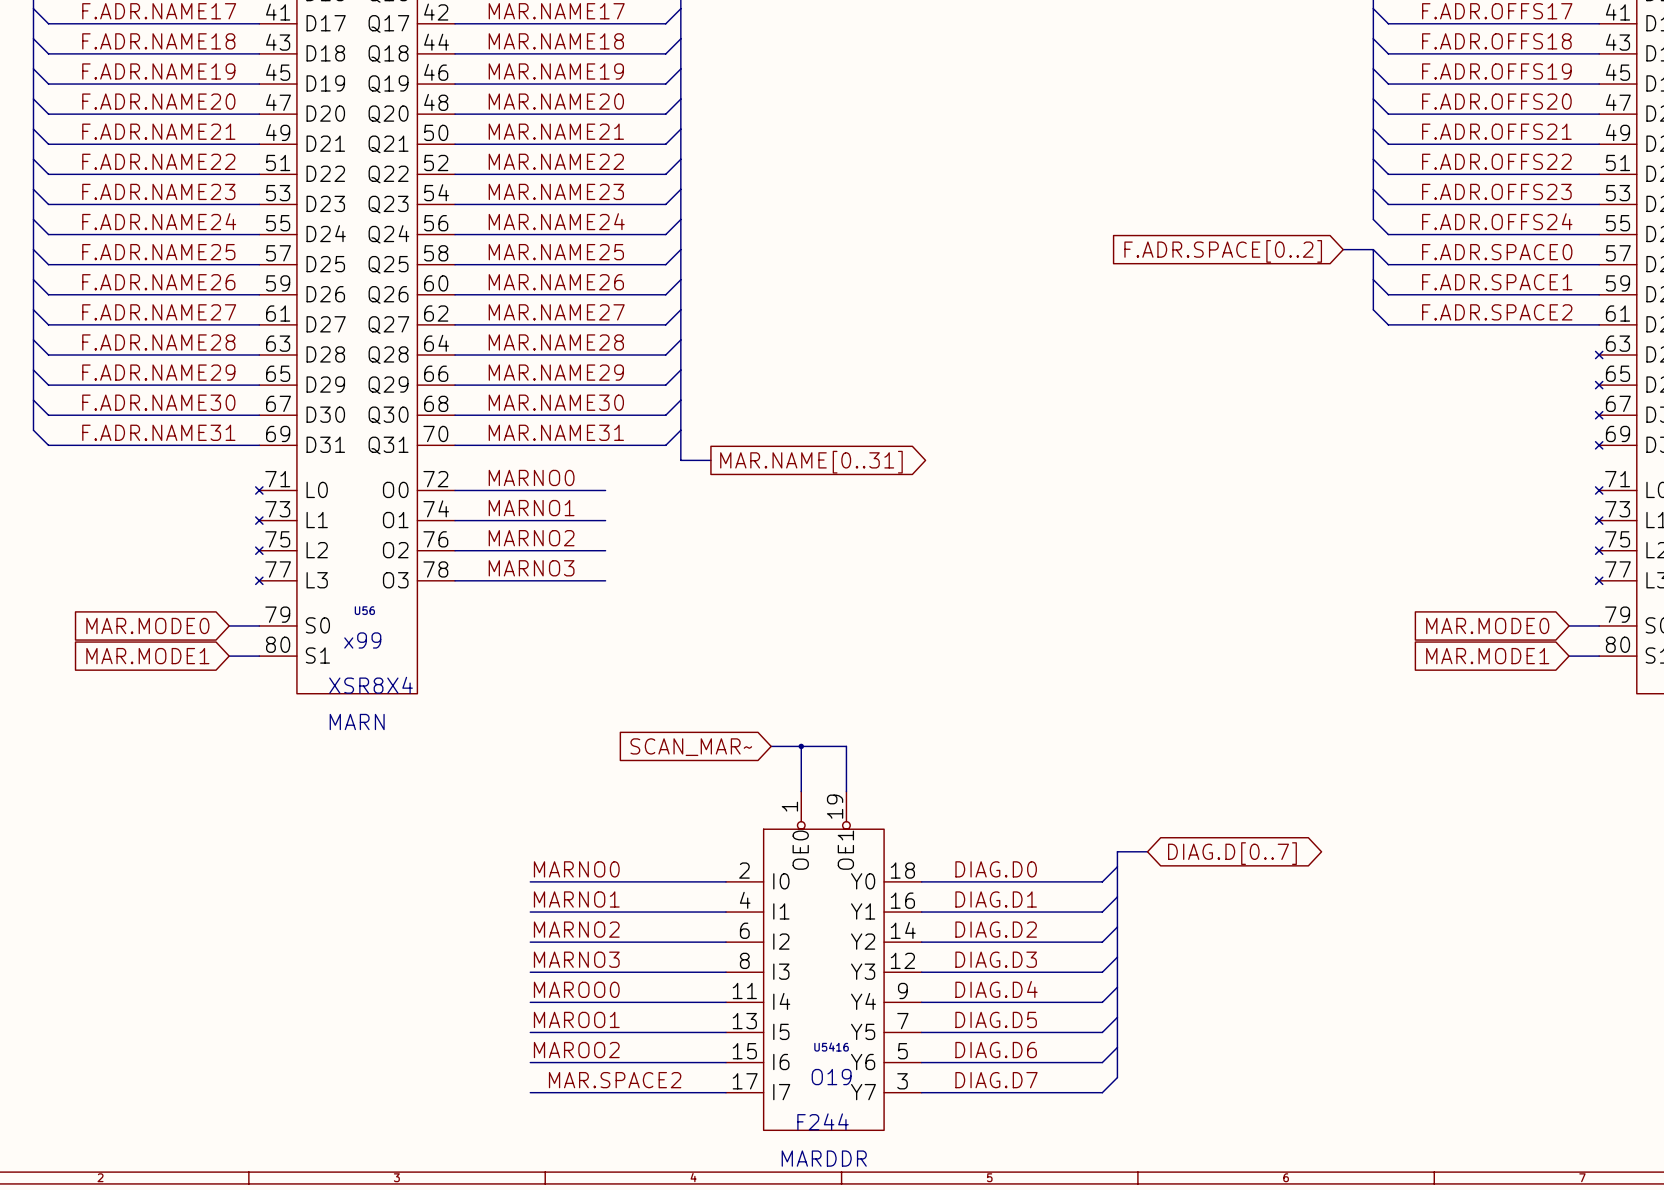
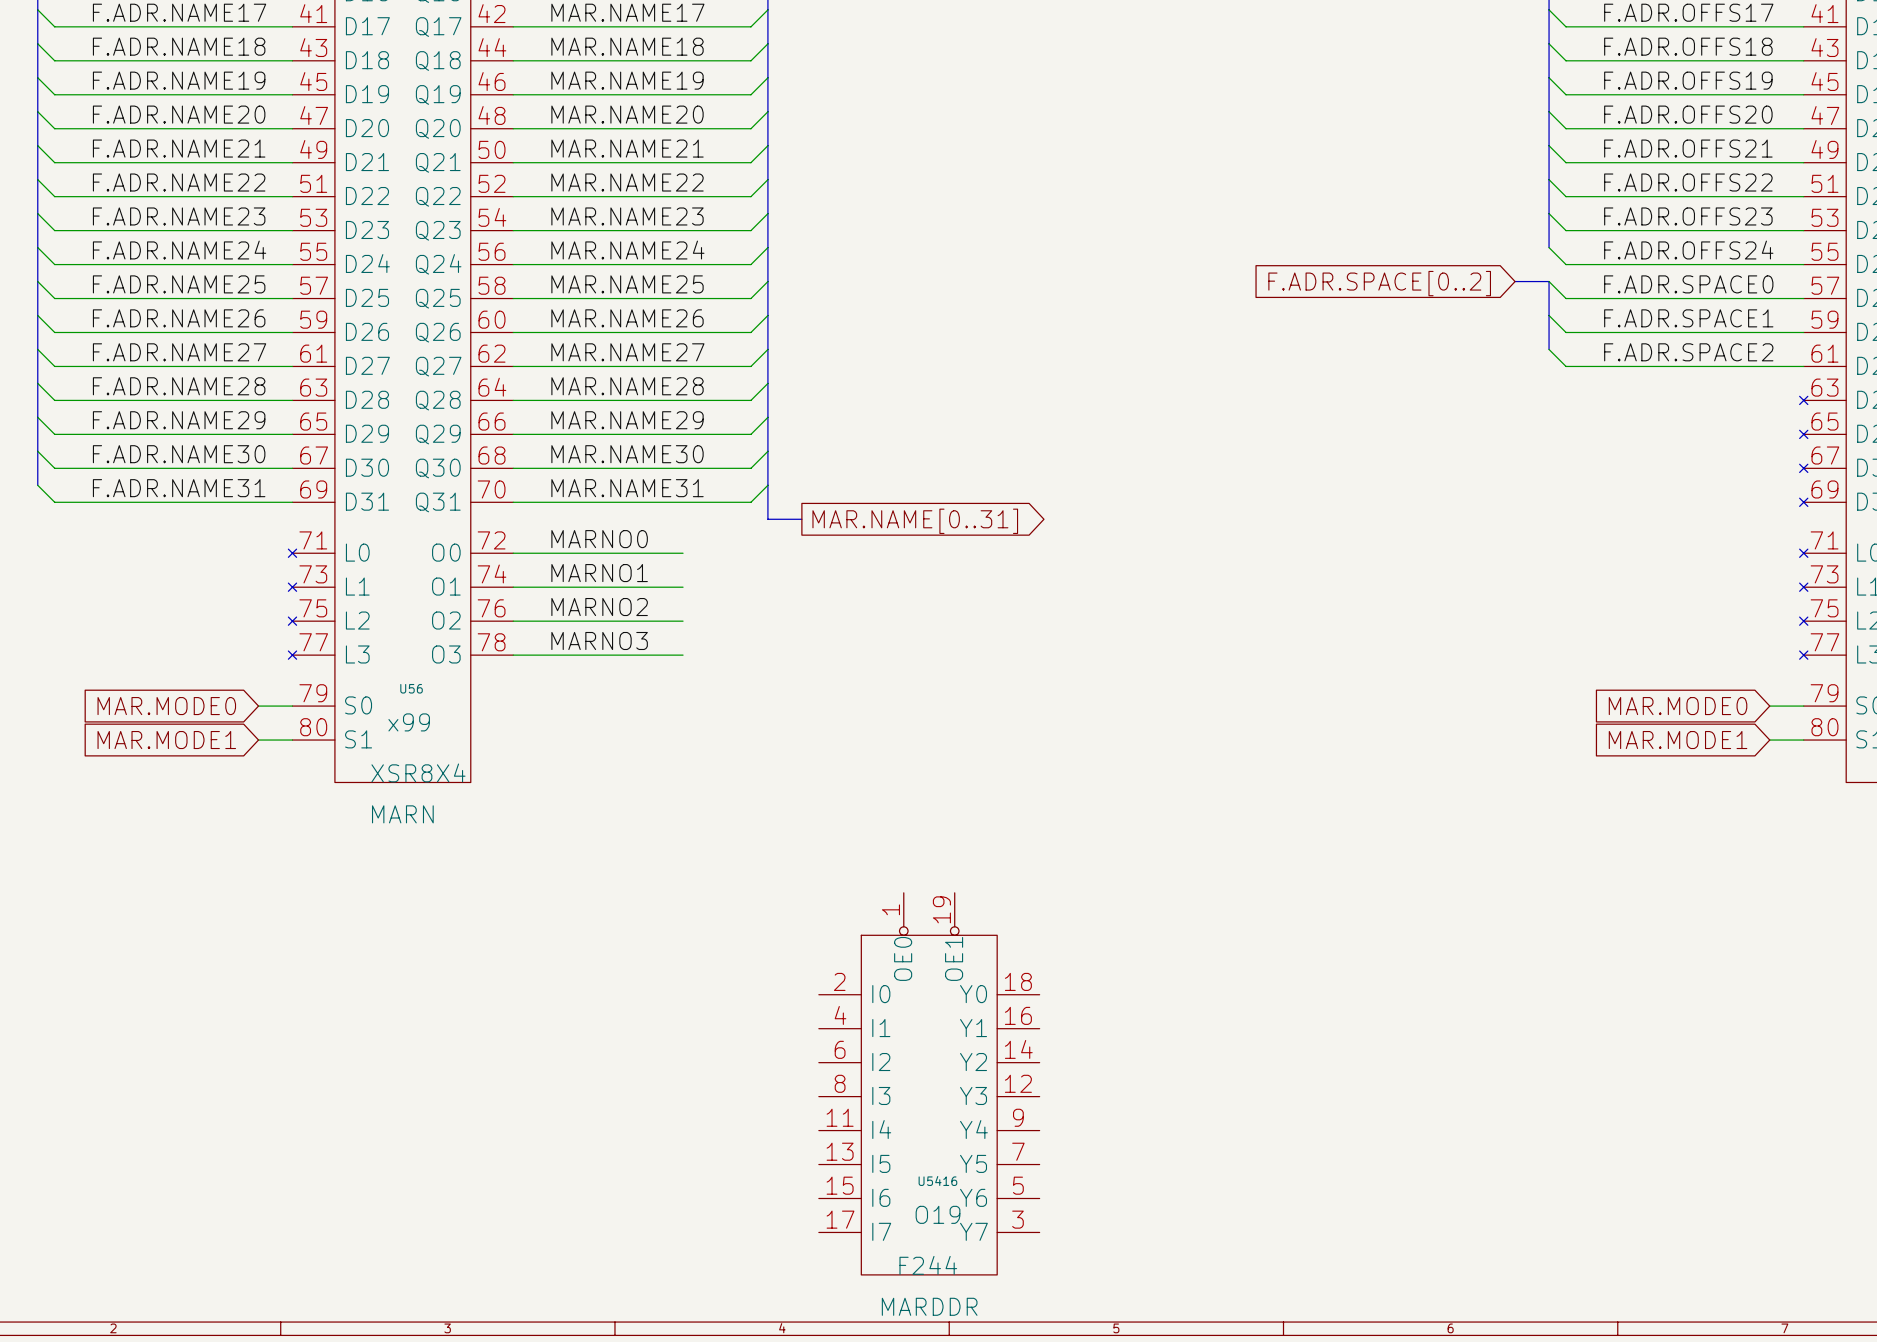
wire: (771, 746) (846, 746) (846, 791) -> none
wire: (801, 746) (801, 791) -> none
junction: (801, 746) -> none
global label: SCAN_MAR~ (691, 747) -> none
bus: (1147, 851) (1117, 851) (1117, 1077) -> none
global label: DIAG.D[0..7] (1232, 853) -> none
wire: (1117, 866) (1102, 881) (921, 881) -> none
label: MARNO0 (576, 869) -> none
label: DIAG.D0 (996, 869) -> none
wire: (530, 881) (726, 881) -> none
wire: (1117, 896) (1102, 912) (921, 912) -> none
label: MARNO1 (576, 899) -> none
label: DIAG.D1 (996, 899) -> none
wire: (530, 912) (726, 912) -> none
wire: (1117, 927) (1102, 942) (921, 942) -> none
label: MARNO2 (576, 929) -> none
label: DIAG.D2 (996, 929) -> none
wire: (530, 942) (726, 942) -> none
wire: (1117, 957) (1102, 972) (921, 972) -> none
label: MARNO3 (576, 959) -> none
label: DIAG.D3 (996, 959) -> none
wire: (530, 972) (726, 972) -> none
wire: (1117, 987) (1102, 1002) (921, 1002) -> none
label: MAROO0 (576, 989) -> none
label: DIAG.D4 (996, 989) -> none
wire: (530, 1002) (726, 1002) -> none
wire: (1117, 1017) (1102, 1032) (921, 1032) -> none
label: MAROO1 (576, 1019) -> none
label: DIAG.D5 (996, 1019) -> none
wire: (530, 1032) (726, 1032) -> none
wire: (1117, 1047) (1102, 1062) (921, 1062) -> none
label: MAROO2 (576, 1050) -> none
label: DIAG.D6 (996, 1050) -> none
wire: (530, 1062) (726, 1062) -> none
wire: (1117, 1077) (1102, 1092) (921, 1092) -> none
label: MAR.SPACE2 (615, 1080) -> none
label: DIAG.D7 (996, 1080) -> none
wire: (530, 1092) (726, 1092) -> none

